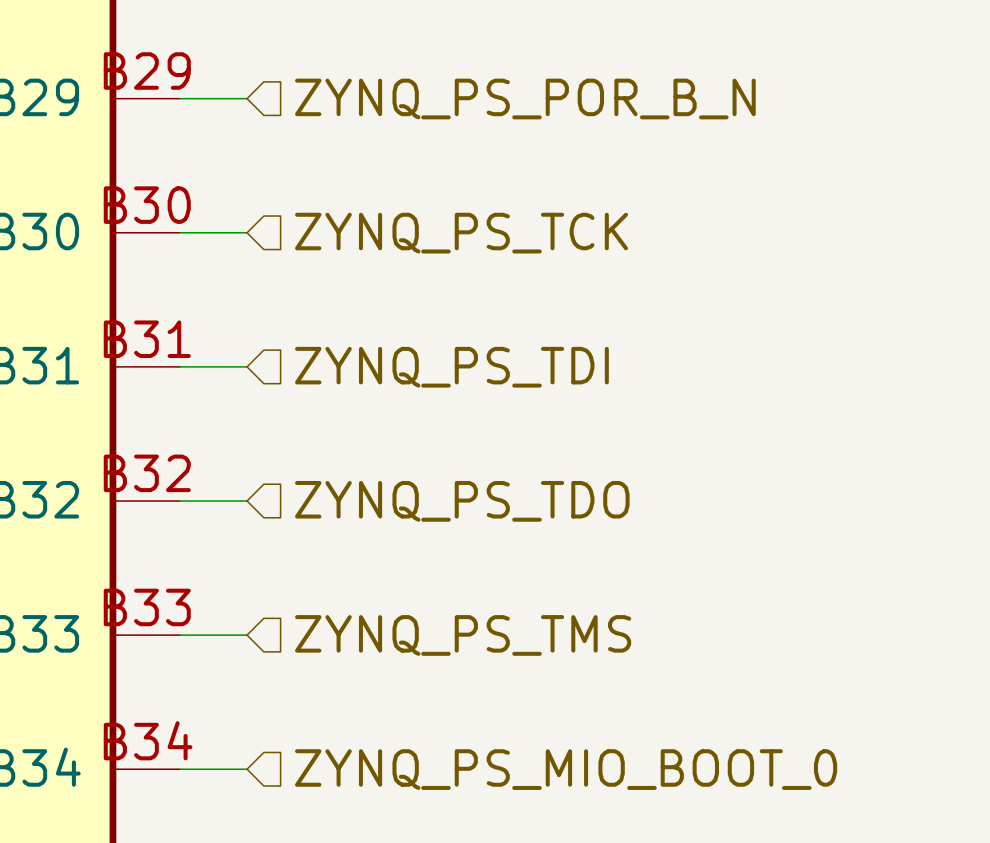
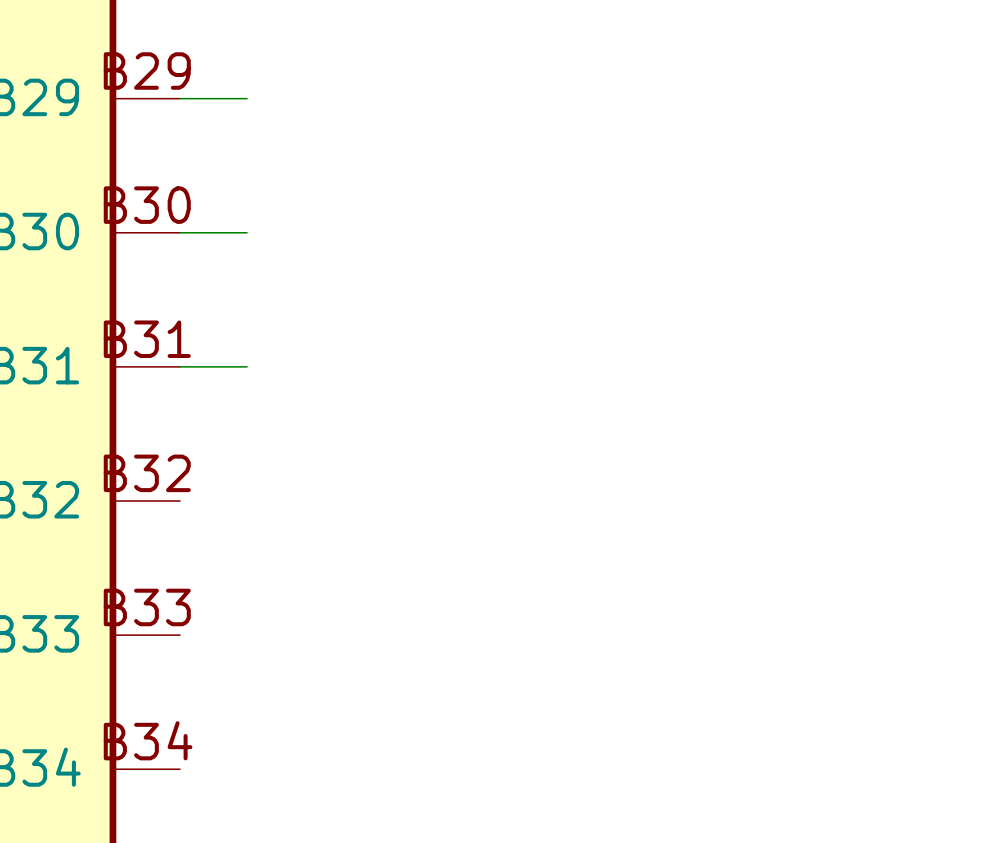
hierarchical label: ZYNQ_PS_POR_B_N (525, 99) -> none
hierarchical label: ZYNQ_PS_TCK (461, 233) -> none
hierarchical label: ZYNQ_PS_TDI (451, 367) -> none
wire: (180, 501) (247, 501) -> none
hierarchical label: ZYNQ_PS_TDO (462, 501) -> none
wire: (180, 635) (247, 635) -> none
hierarchical label: ZYNQ_PS_TMS (463, 635) -> none
wire: (180, 769) (247, 769) -> none
hierarchical label: ZYNQ_PS_MIO_BOOT_0 (566, 769) -> none

